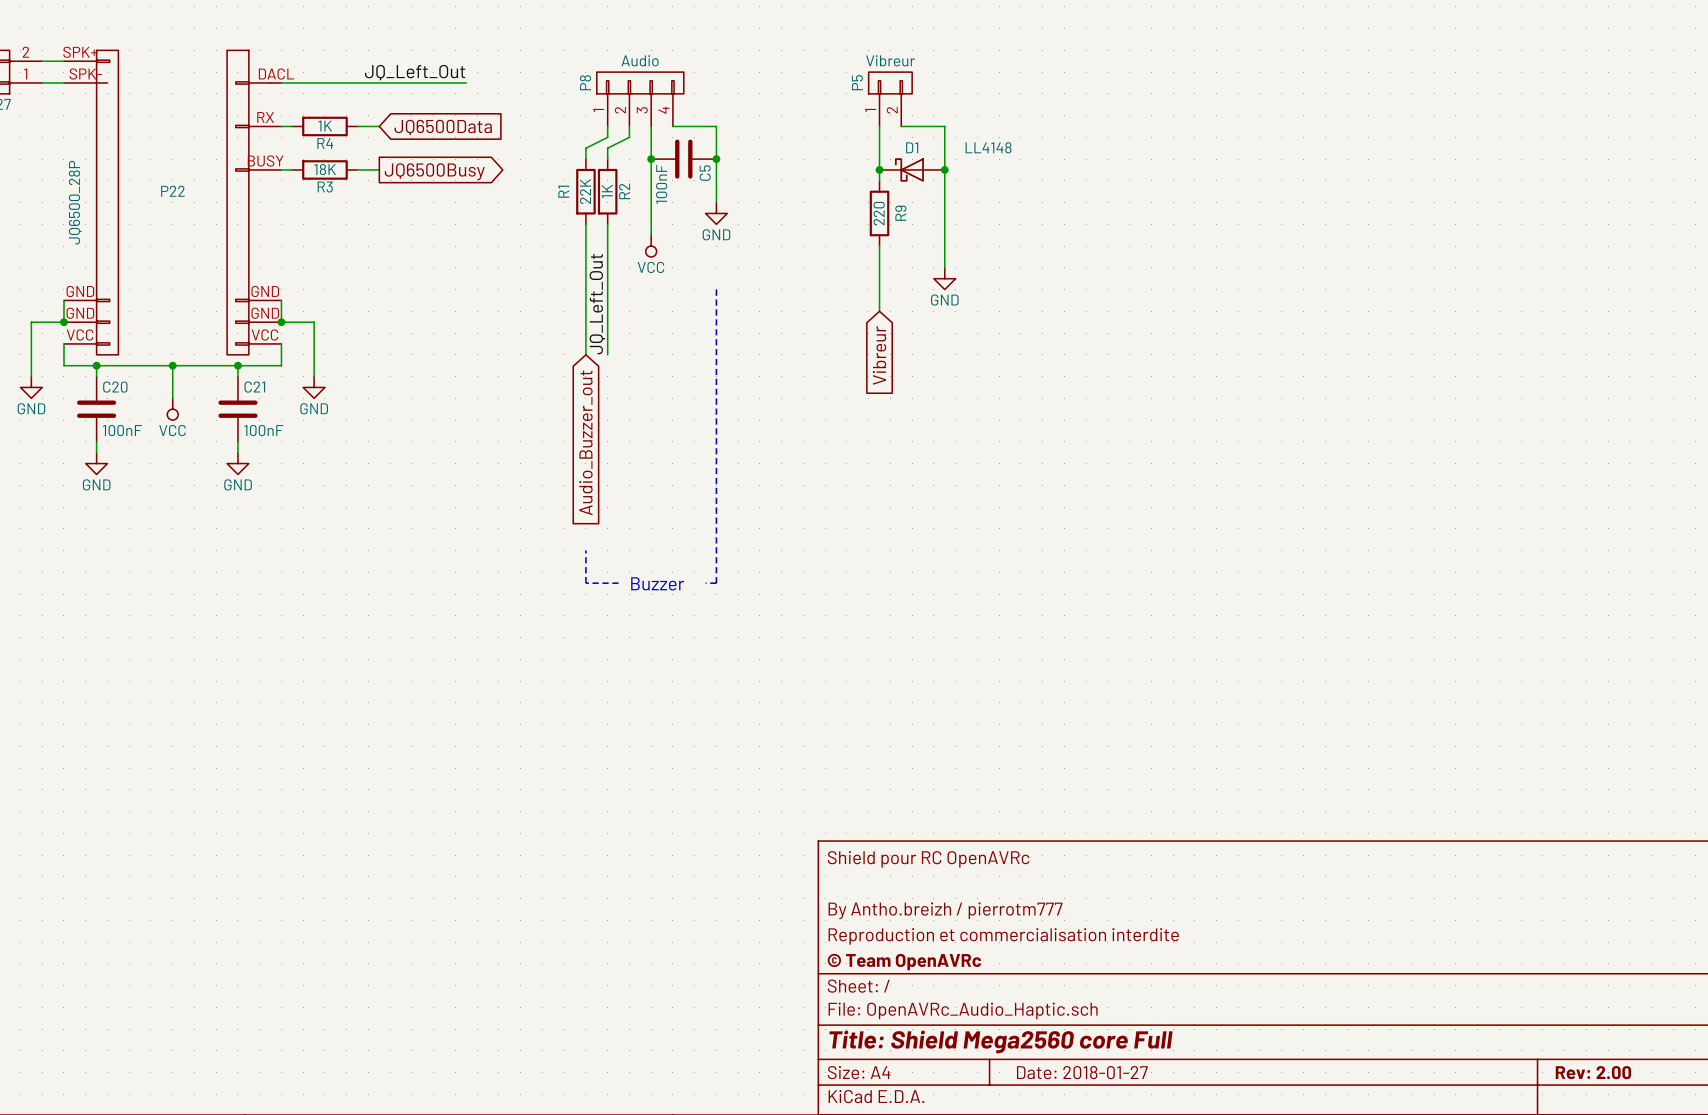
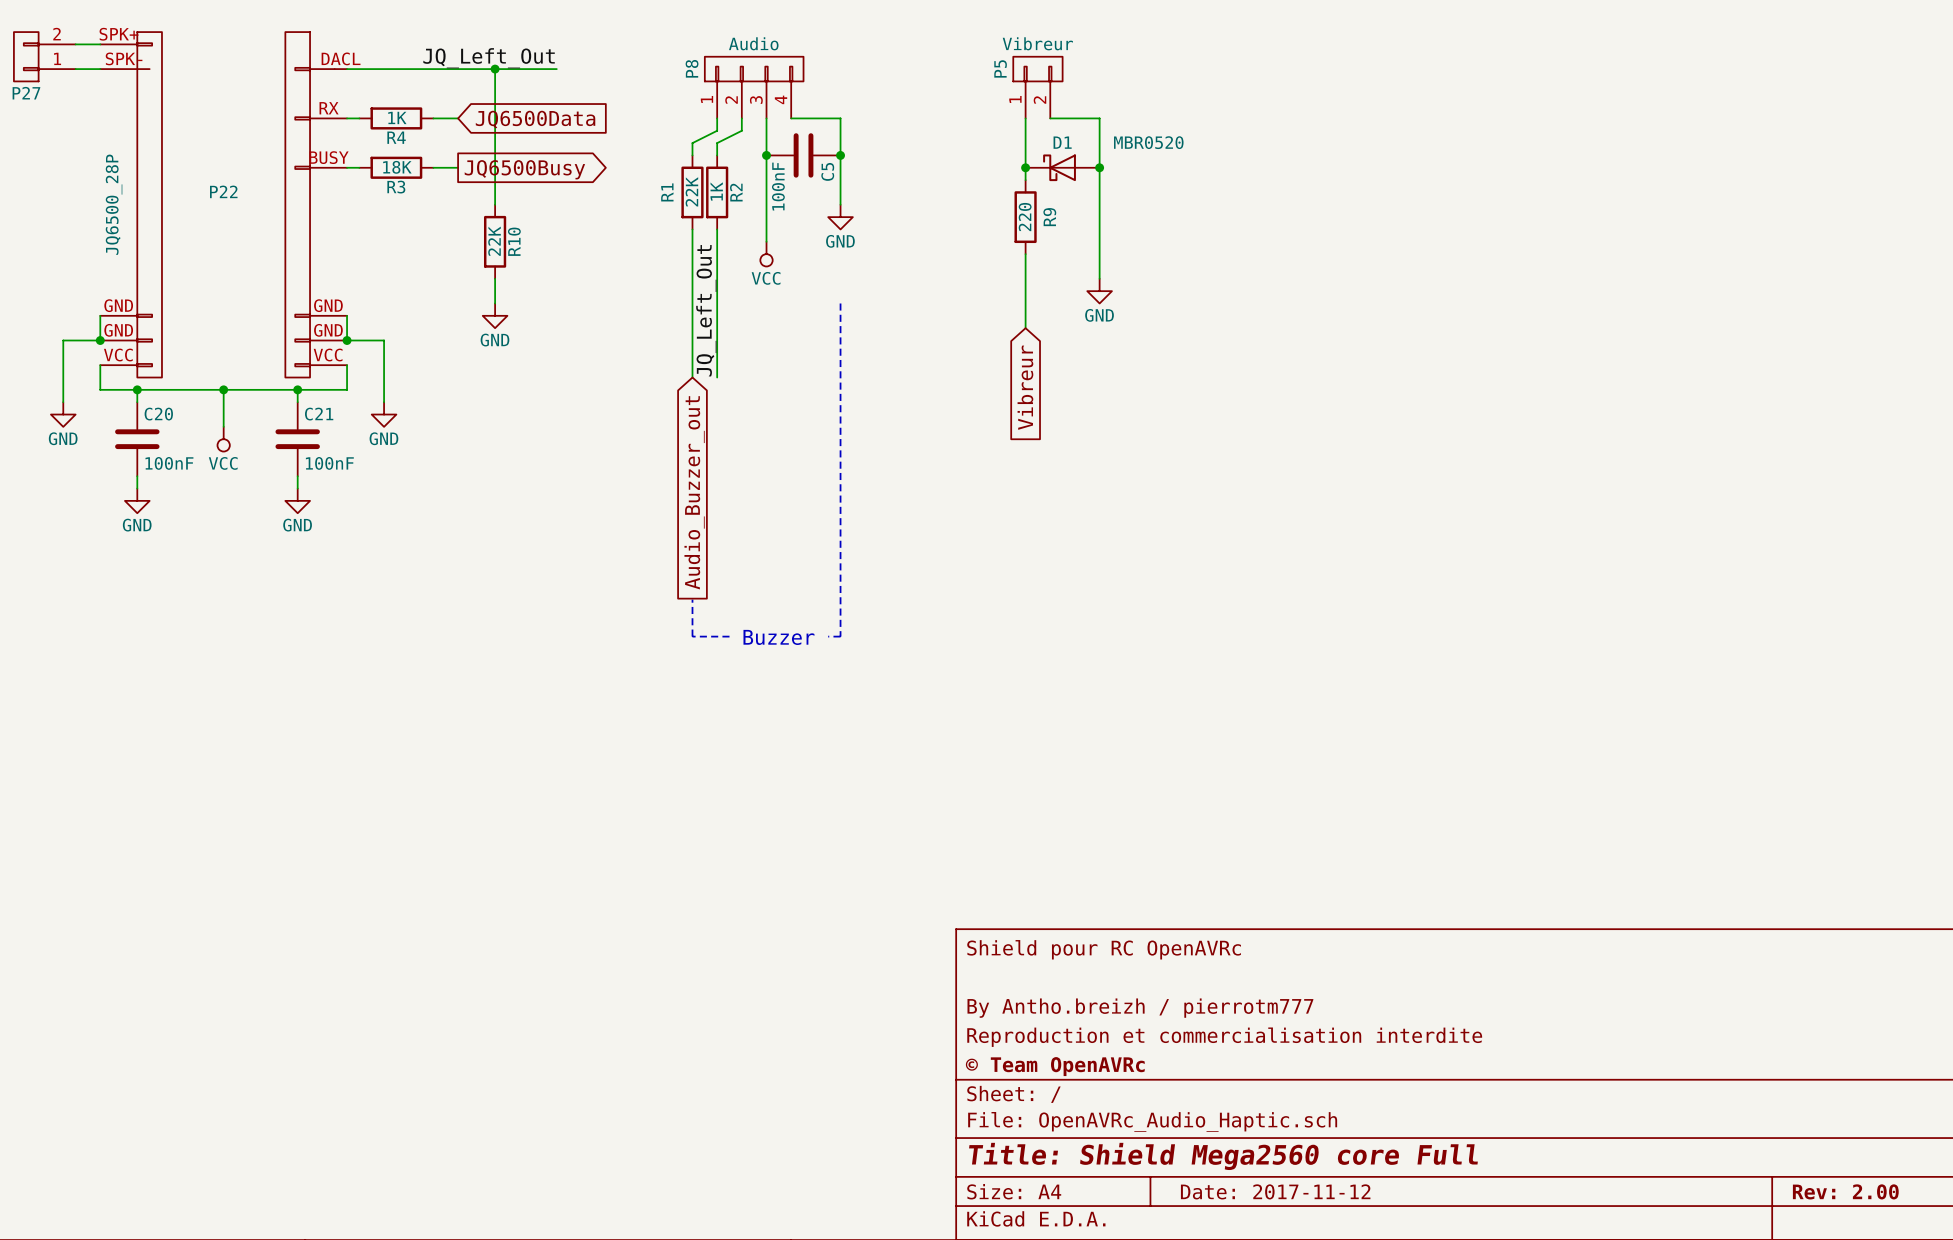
wire: none -> (495, 69) (495, 204)
junction: none -> (495, 69)
D1 value: LL4148 (988, 147) -> MBR0520 (1148, 142)
R10: none -> 22K (495, 241)
wire: none -> (495, 278) (495, 303)
power symbol: none -> GND (495, 315)
title block: Date: 2018-01-27 (1082, 1072) -> Date: 2017-11-12 (1275, 1191)

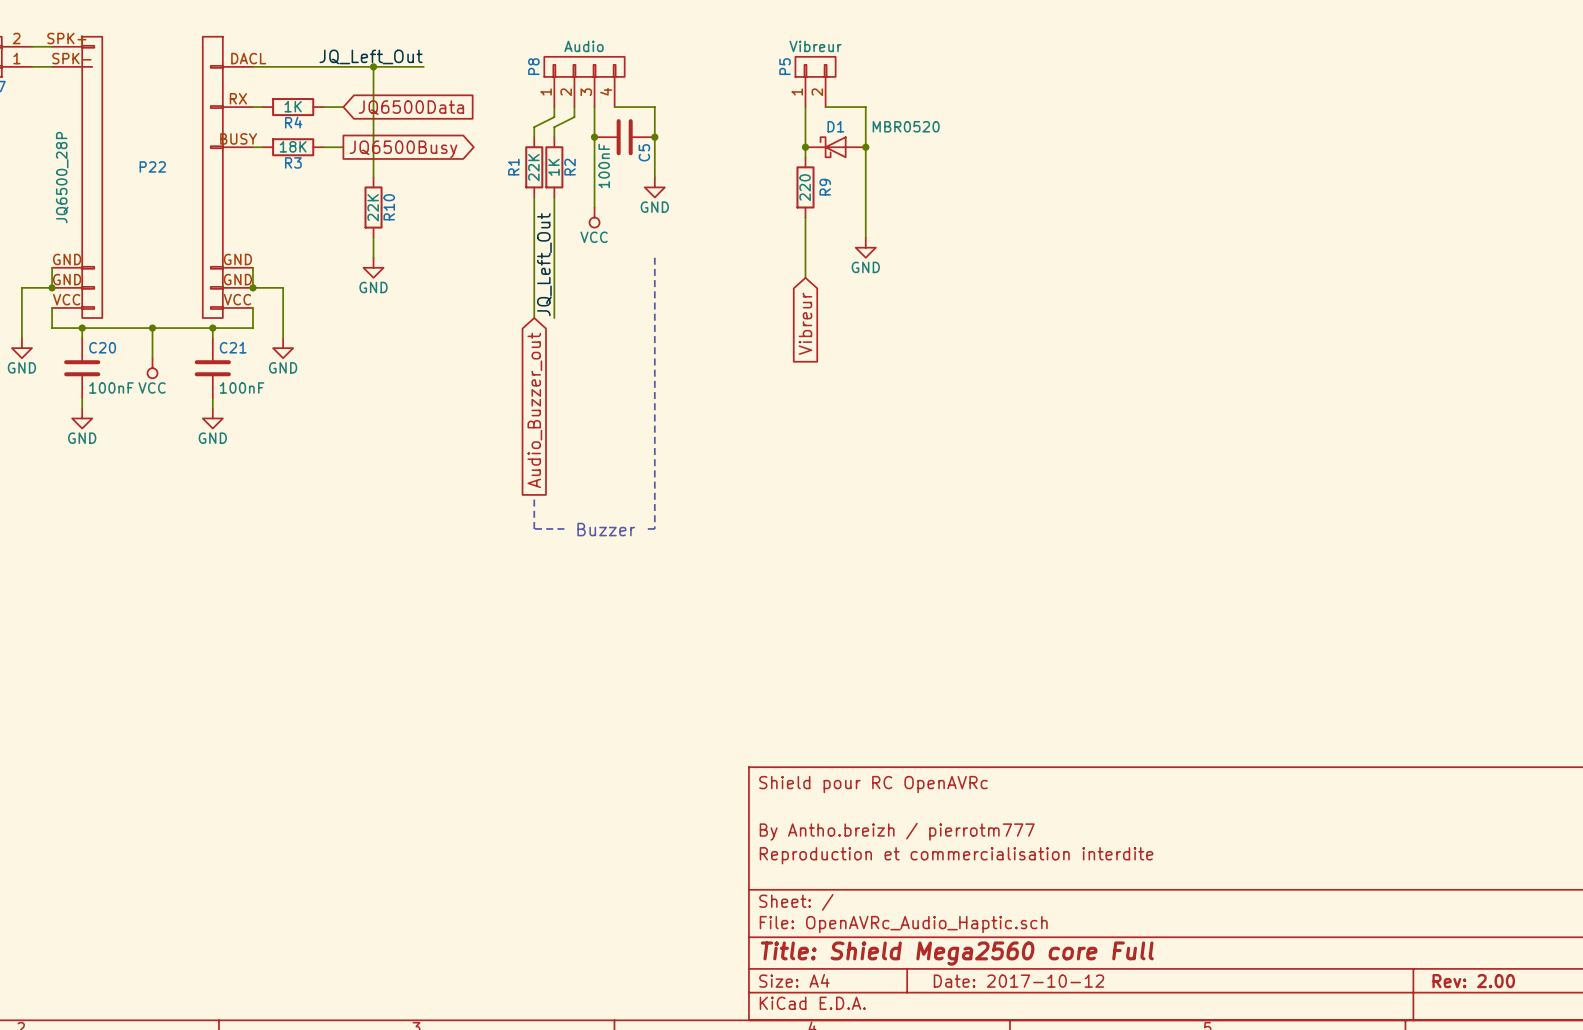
title block: © Team OpenAVRc (1055, 1066) -> none
title block: Date: 2017-11-12 (1275, 1191) -> Date: 2017-10-12 (1018, 981)

